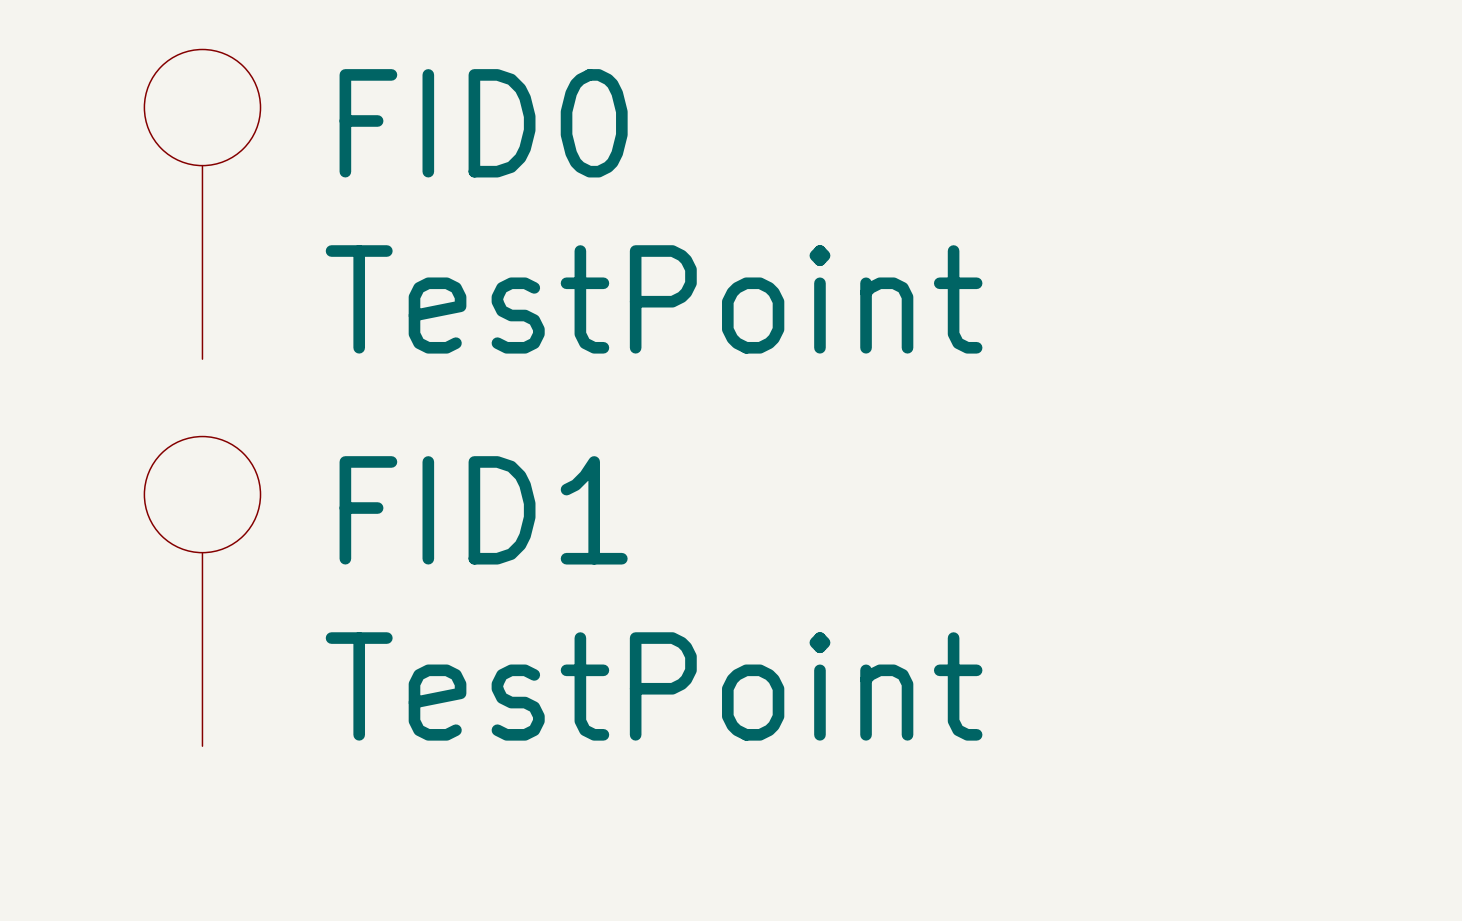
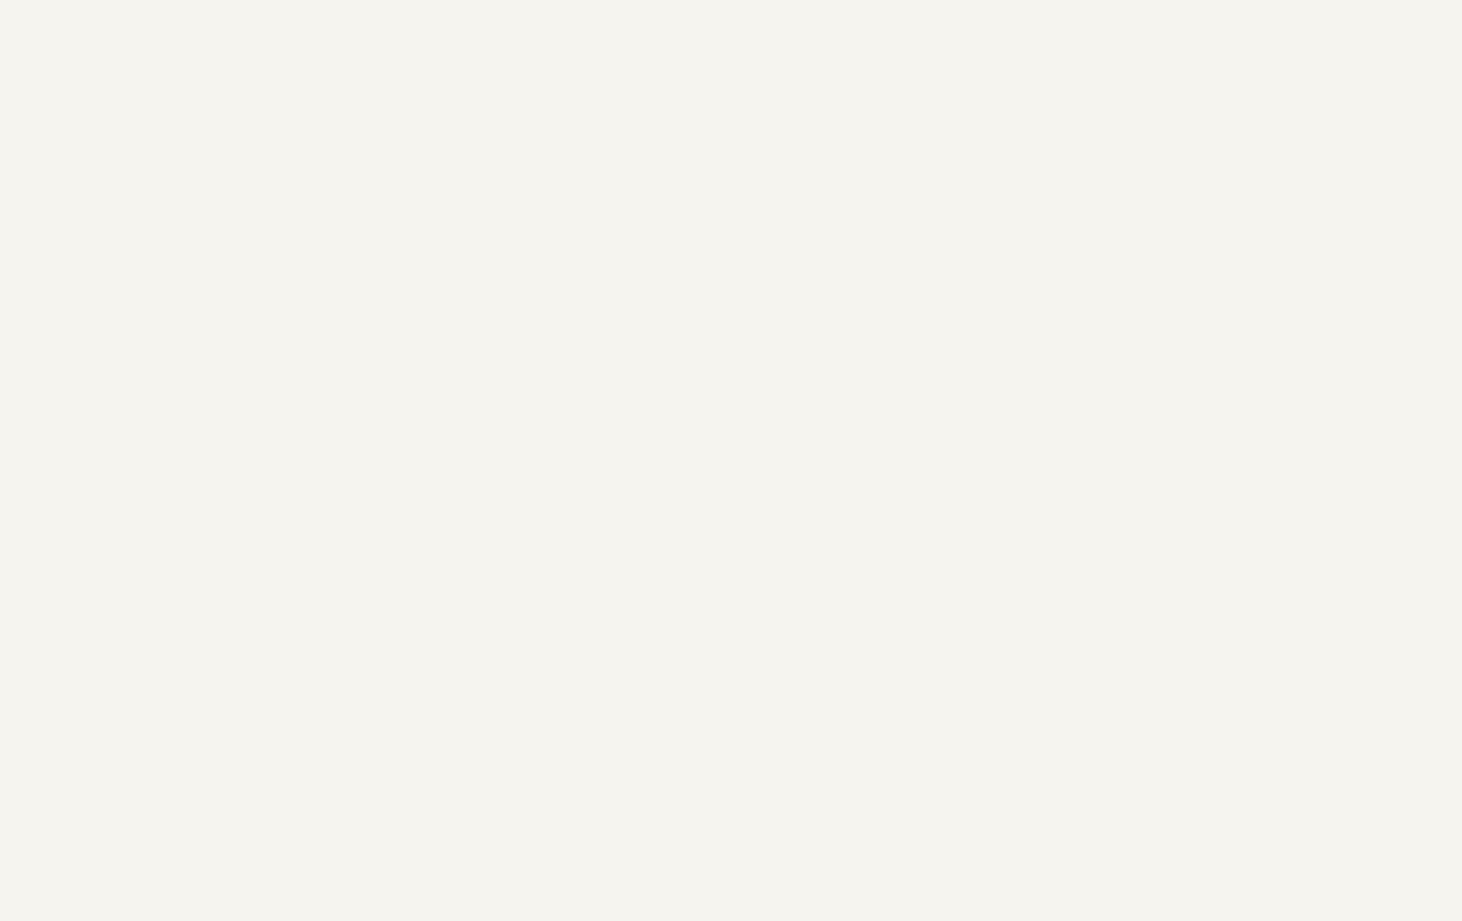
FID0: TestPoint (202, 204) -> none
FID1: TestPoint (202, 591) -> none

